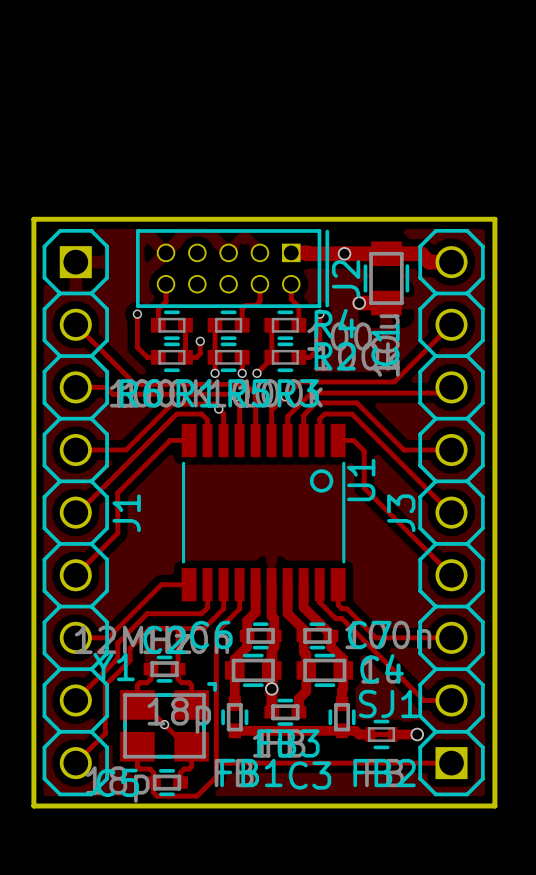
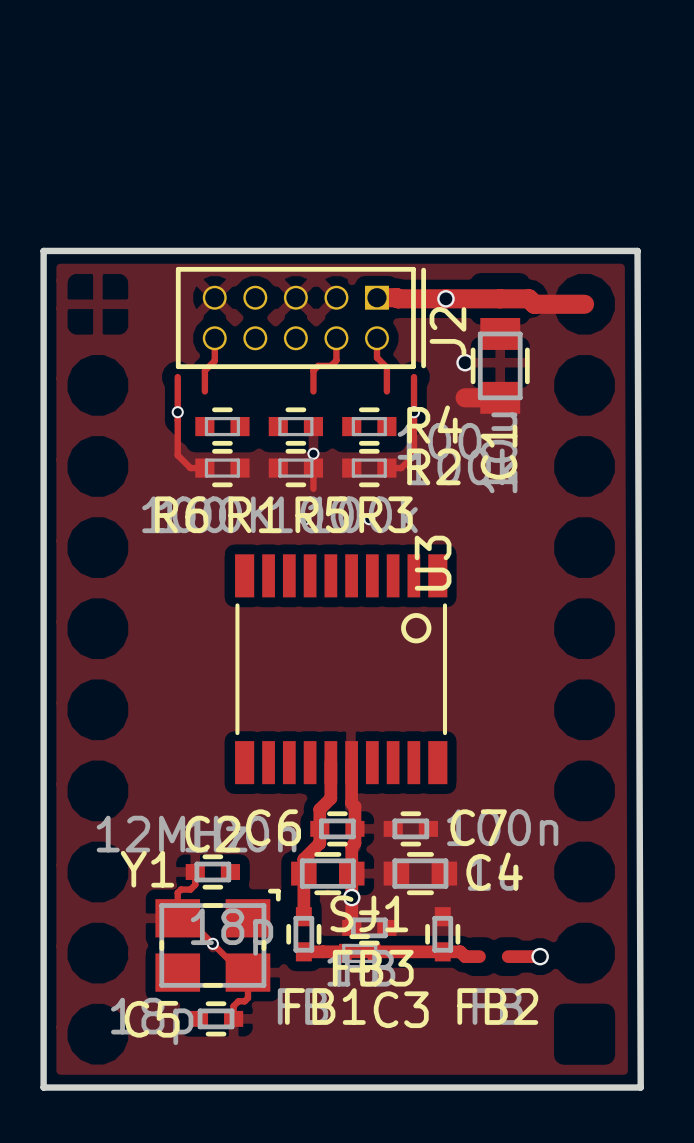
board edge: (33, 219) (494, 219) (494, 806) (33, 806) -> (43, 289) (43, 250) (637, 250) (640, 1087) (43, 1087) (43, 1049)
track: none -> (376, 297) (528, 298) (534, 304) (584, 304)
via: none -> (445, 298)
track: (291, 252) (420, 253) (429, 262) (451, 262) -> none
via: (344, 253) -> none
J2 position: (232, 268) -> (300, 317)
via: none -> (465, 362)
track: (166, 284) (166, 301) (158, 309) (158, 325) -> (214, 338) (214, 360) (204, 370) (204, 391)
track: (259, 284) (259, 301) (255, 305) (245, 305) (242, 309) (242, 325) -> (336, 338) (336, 360) (331, 365) (318, 365) (313, 370) (313, 391)
track: (291, 284) (291, 299) (298, 306) (298, 325) -> (376, 338) (376, 357) (386, 367) (386, 391)
track: none -> (177, 377) (177, 412)
track: none -> (414, 377) (414, 412)
via: (359, 303) -> none
track: (75, 324) (135, 384) (245, 384) (255, 394) (255, 440) -> none
track: (451, 324) (394, 381) (300, 381) (271, 410) (271, 440) -> none
track: (185, 325) (185, 357) (196, 357) (200, 353) (200, 341) -> none
track: (215, 325) (215, 373) -> none
track: (271, 325) (271, 358) (257, 373) -> none
via: (200, 341) -> none
via: none -> (313, 453)
via: (215, 373) -> none
via: (242, 373) -> none
via: (257, 373) -> none
track: (75, 387) (105, 387) (112, 394) (233, 394) (239, 400) (239, 440) -> none
track: (451, 387) (445, 393) (311, 393) (287, 416) (287, 440) -> none
via: (218, 409) -> none
track: (189, 440) (170, 440) (117, 492) (117, 533) (75, 575) -> none
track: (207, 440) (207, 420) (201, 414) (176, 414) (78, 512) (75, 512) -> none
track: (223, 440) (223, 413) (213, 404) (171, 404) (126, 450) (75, 450) -> none
track: (303, 440) (303, 415) (316, 402) (356, 402) (403, 450) (451, 450) -> none
track: (319, 440) (319, 419) (324, 414) (351, 414) (451, 512) -> none
track: (338, 440) (353, 440) (364, 450) (364, 487) (451, 575) -> none
U1 name: U1 (361, 480) -> U3 (433, 563)
J1: (75, 512) -> none
J3: (451, 512) -> none
track: (189, 584) (161, 584) (108, 637) (75, 637) -> none
track: (207, 584) (207, 607) (201, 613) (147, 613) (117, 643) (117, 658) (75, 700) -> none
track: (223, 584) (223, 608) (203, 628) (149, 628) (130, 648) (130, 660) (105, 685) (105, 733) (75, 763) -> none
track: (239, 584) (239, 608) (216, 632) (216, 776) (197, 796) (157, 796) (153, 792) (153, 772) (149, 769) (139, 769) (137, 766) (137, 746) -> none
track: (287, 584) (287, 613) (303, 629) (303, 651) (306, 654) (306, 691) (298, 698) (298, 712) -> none
track: (303, 584) (303, 607) (330, 634) (330, 646) (343, 659) (342, 703) -> none
track: (319, 584) (319, 602) (335, 618) (342, 618) (423, 700) (451, 700) -> none
track: (338, 584) (338, 604) (342, 608) (346, 608) (376, 637) (451, 637) -> none
track: (176, 628) (178, 679) (181, 682) (189, 682) (191, 685) (191, 704) -> none
SJ1 position: (381, 734) -> (359, 953)
track: (216, 761) (451, 763) -> none

